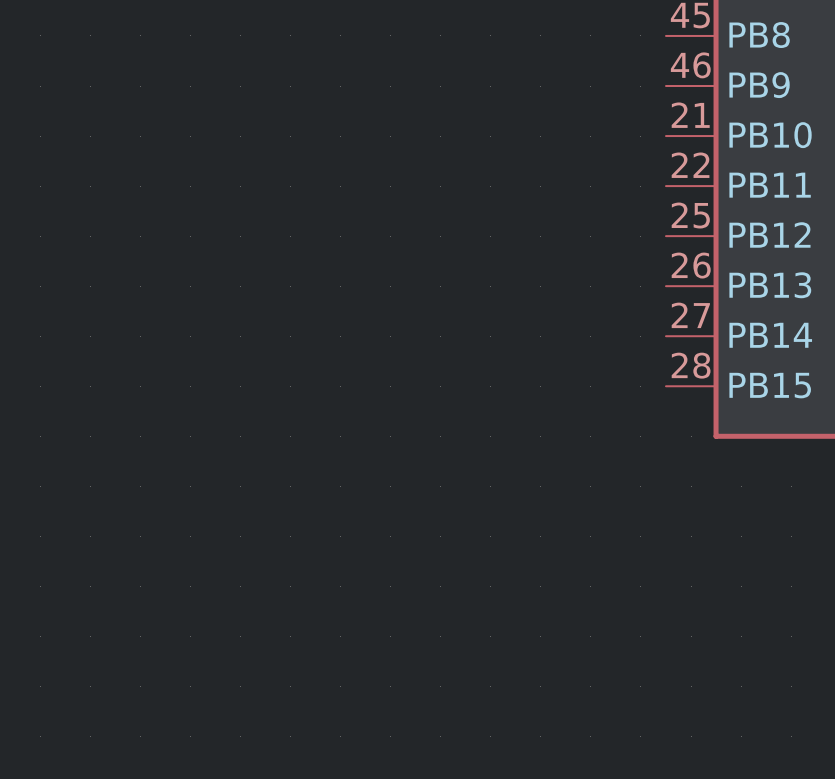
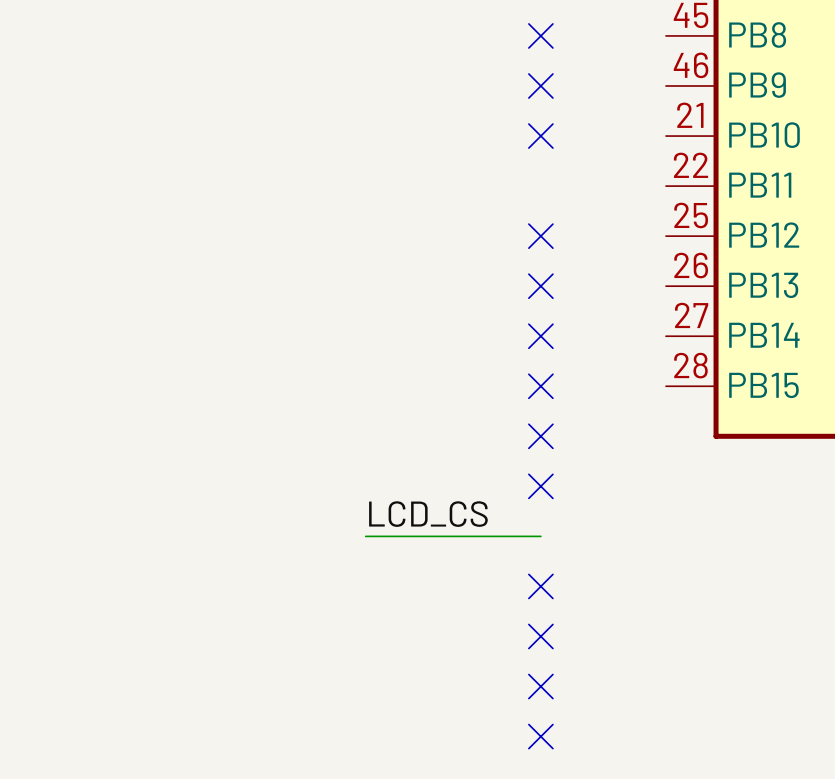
no-connect mark: none -> (540, 35)
no-connect mark: none -> (540, 86)
no-connect mark: none -> (540, 136)
no-connect mark: none -> (540, 236)
no-connect mark: none -> (540, 286)
no-connect mark: none -> (540, 336)
no-connect mark: none -> (540, 386)
no-connect mark: none -> (540, 436)
no-connect mark: none -> (540, 486)
label: none -> LCD_CS (428, 514)
wire: none -> (365, 536) (540, 536)
no-connect mark: none -> (540, 586)
no-connect mark: none -> (540, 636)
no-connect mark: none -> (540, 686)
no-connect mark: none -> (540, 736)

